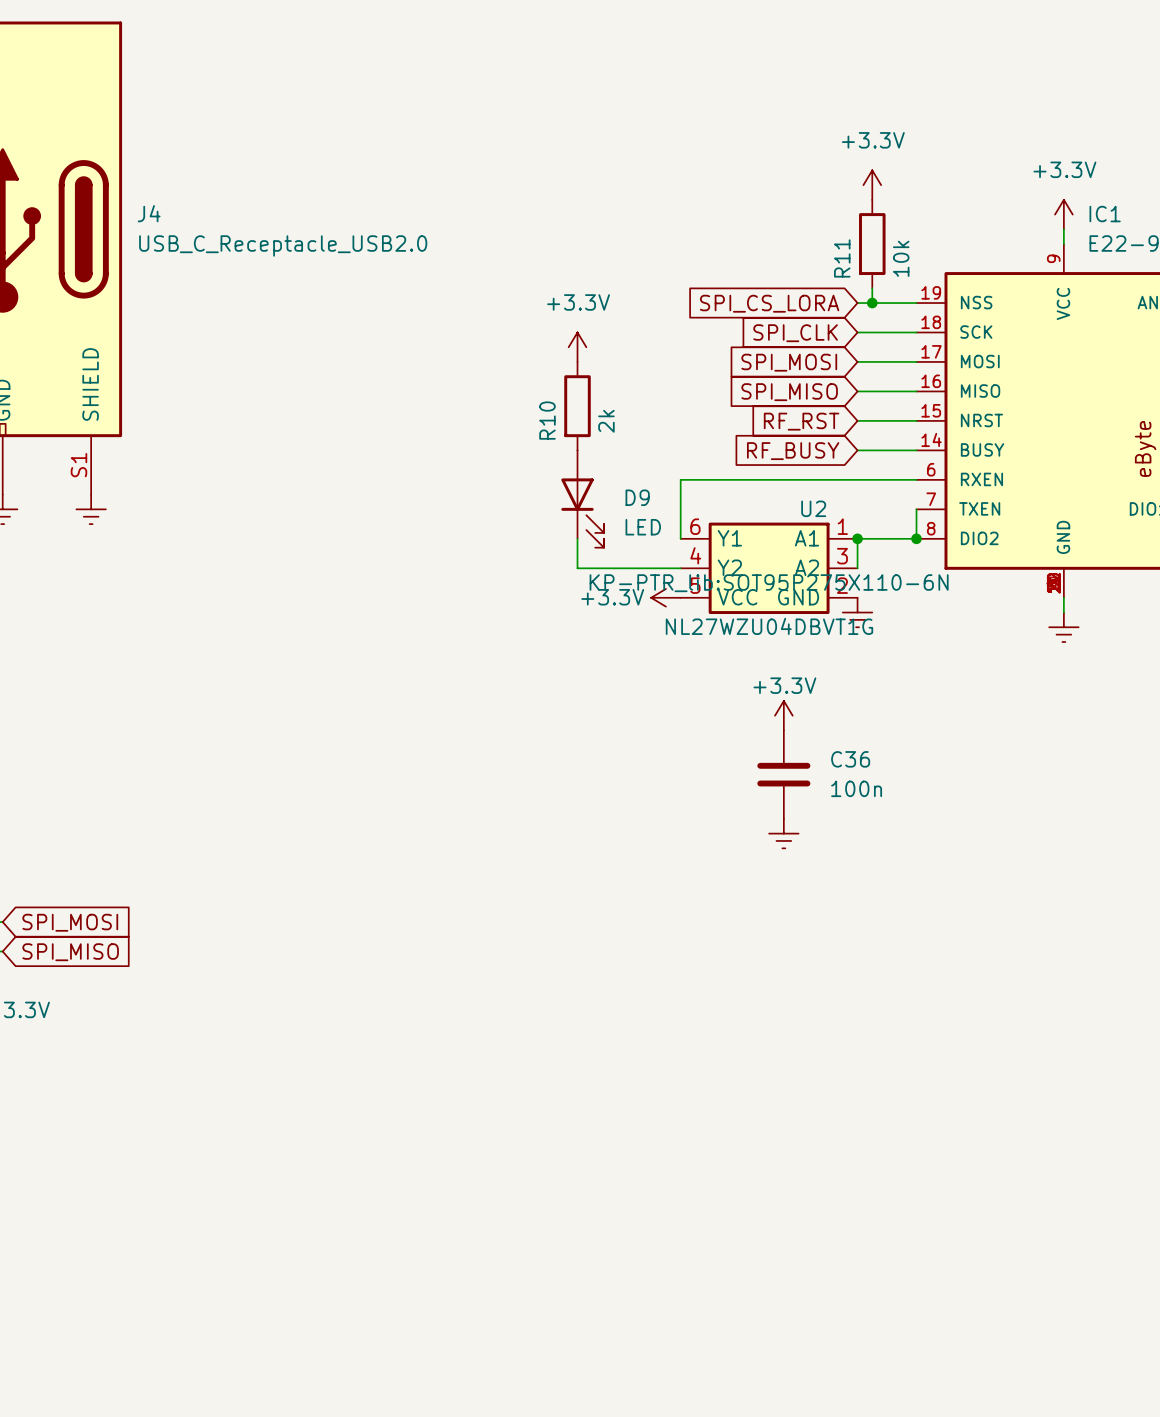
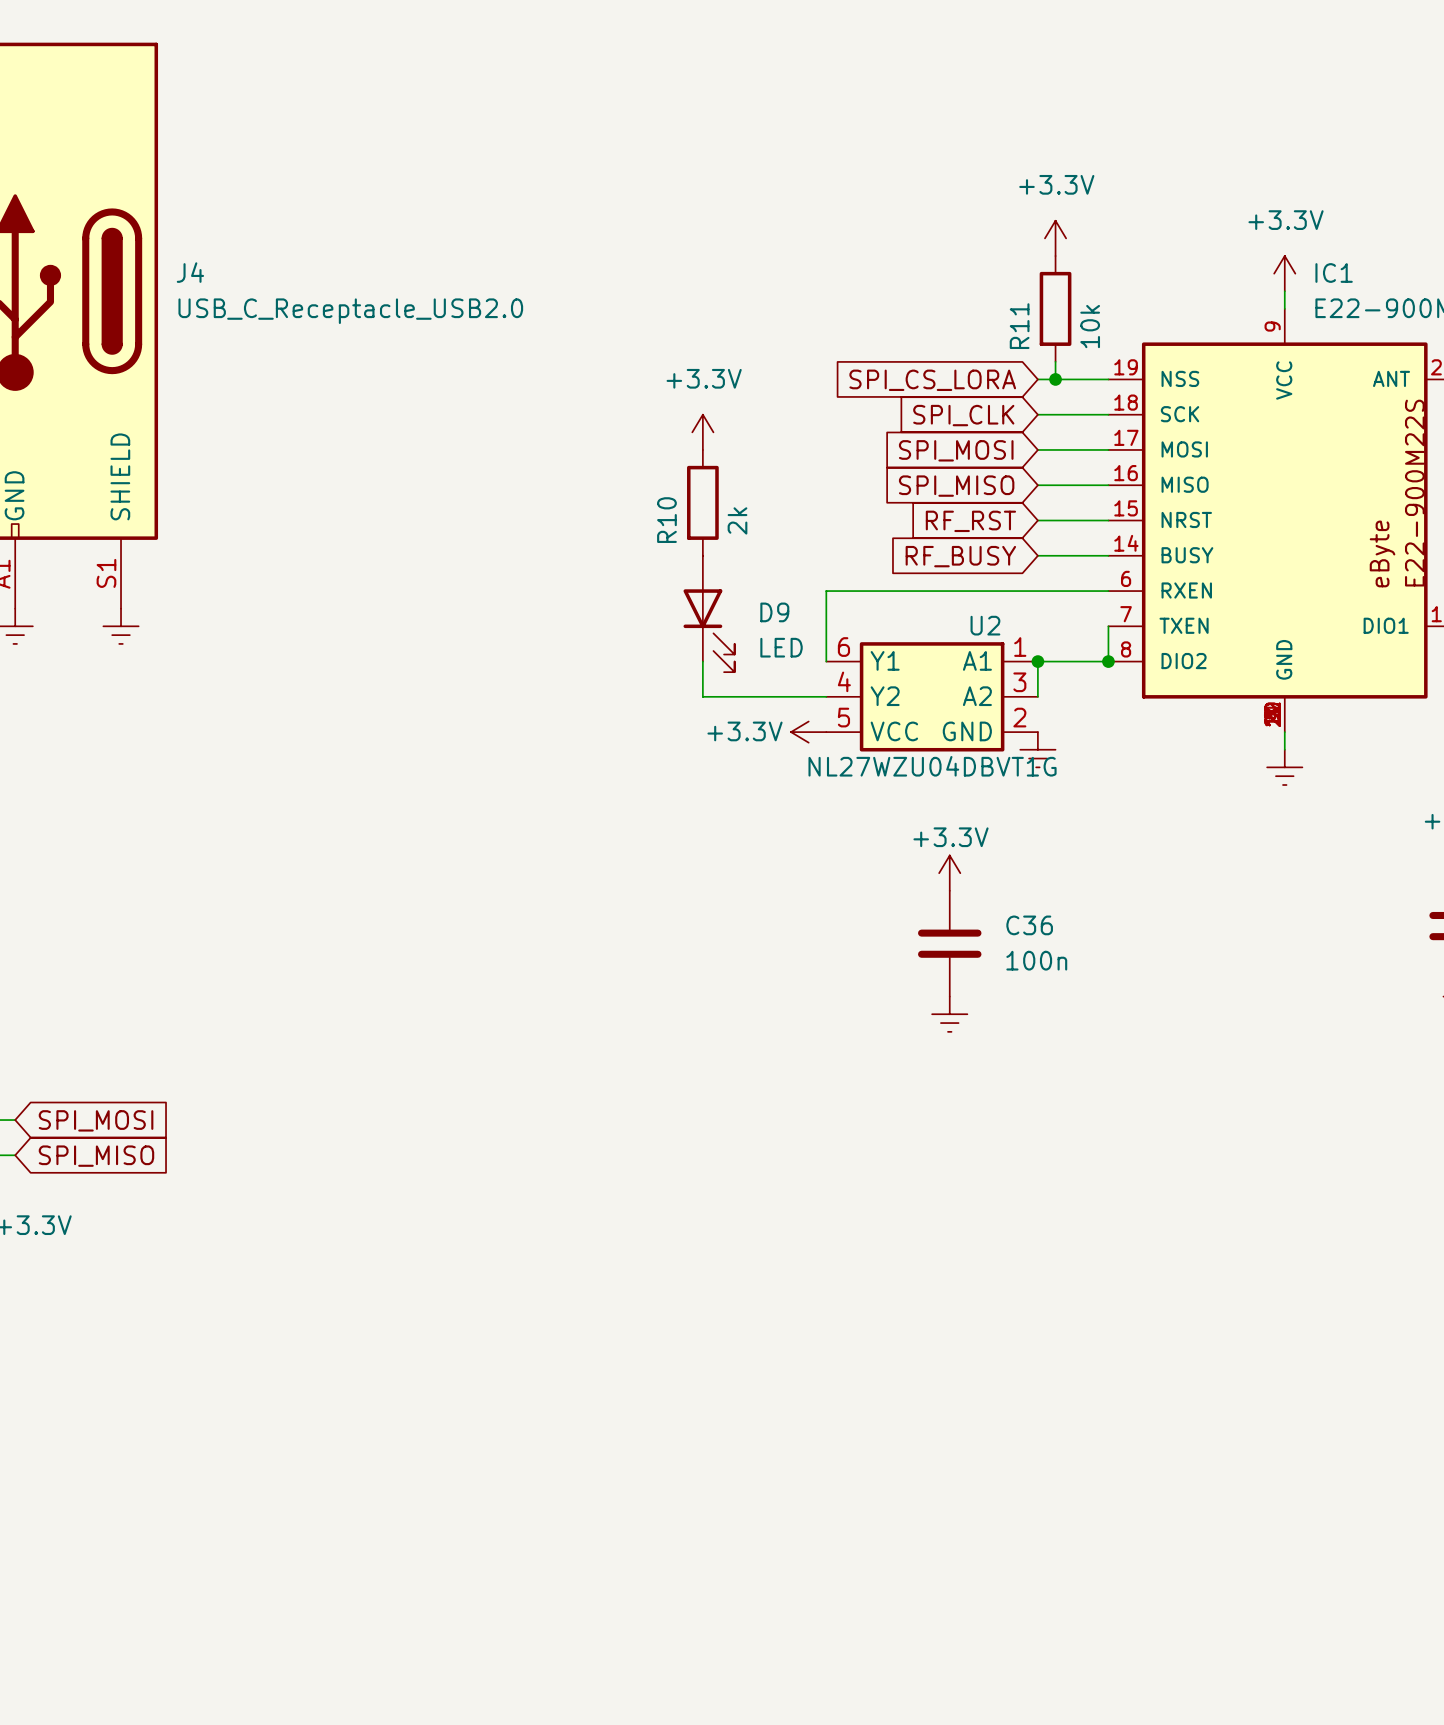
U2 text: KP-PTR_lib:SOT95P275X110-6N (769, 583) -> none

